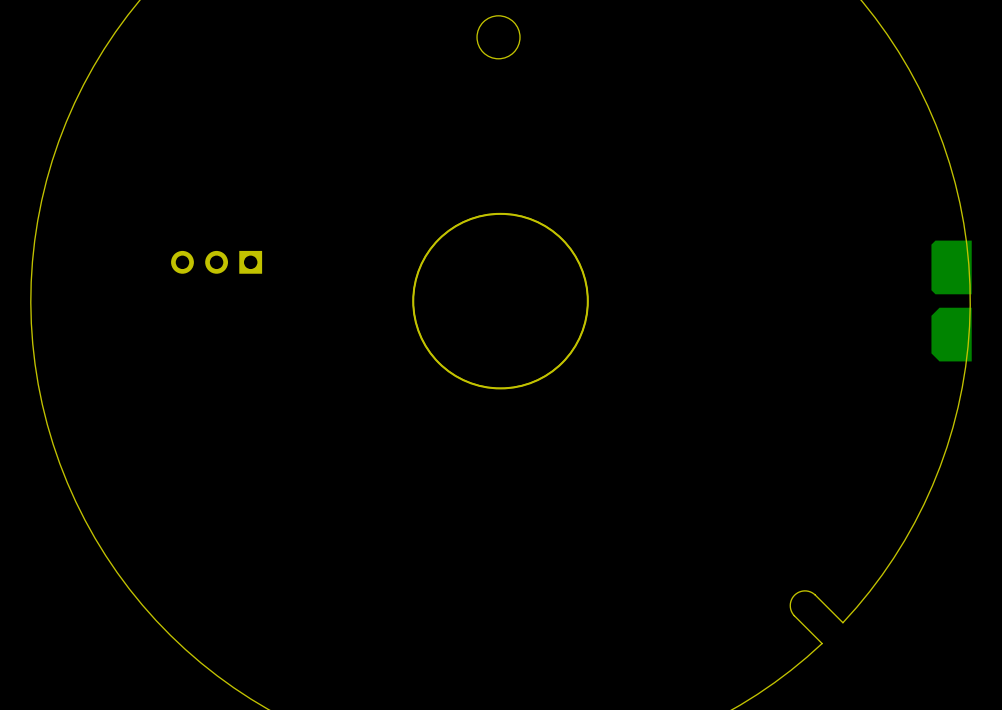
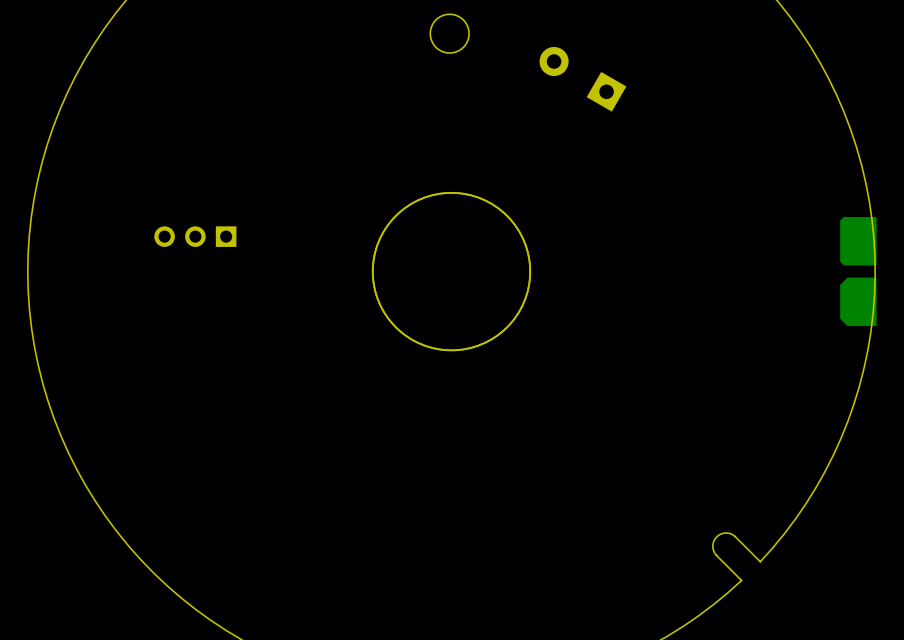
part: none -> (582, 79)

